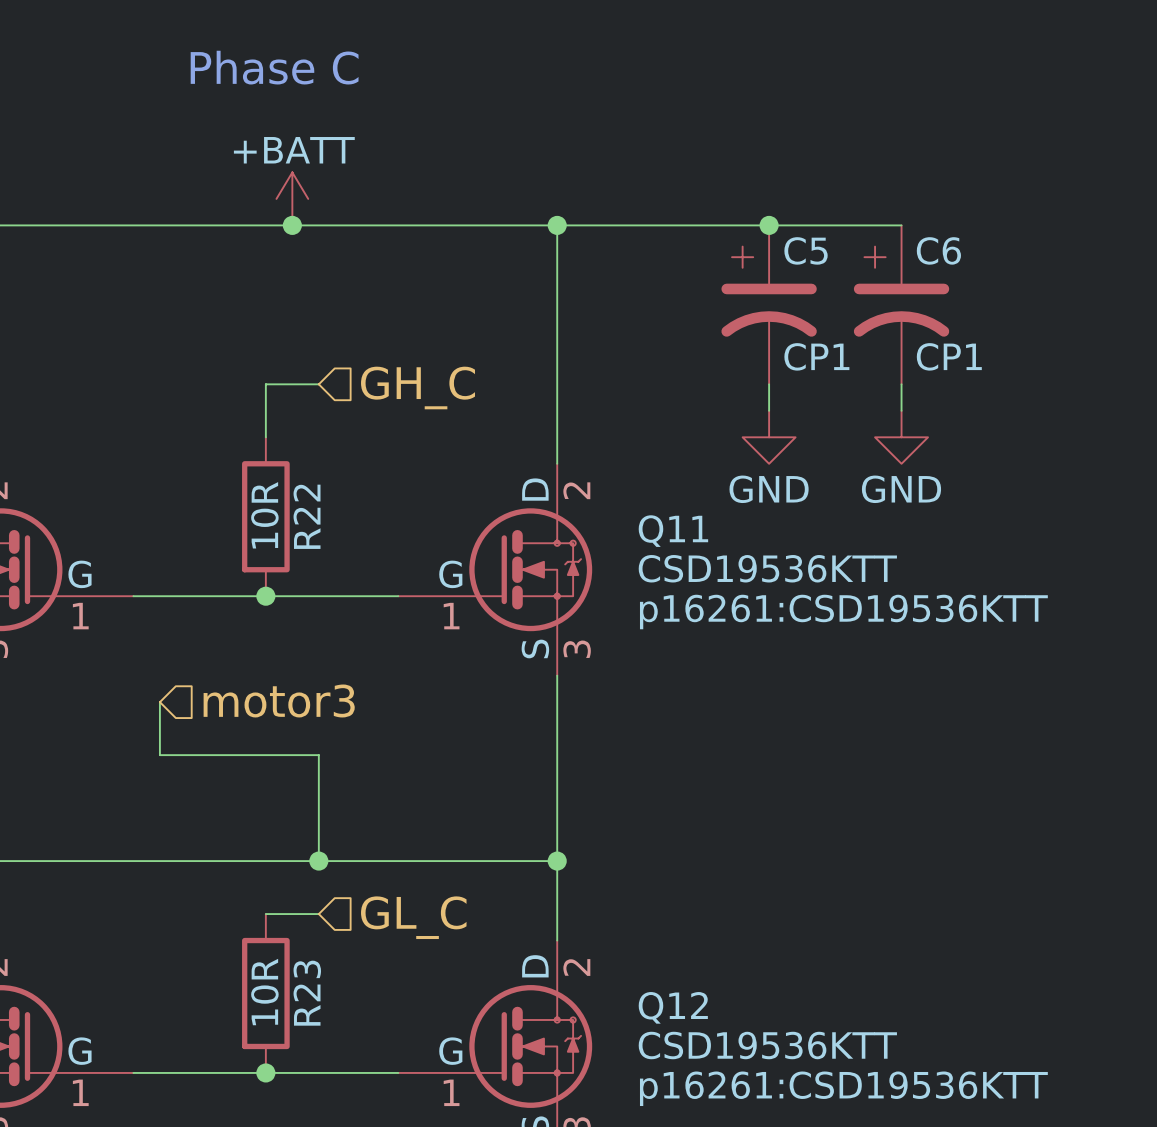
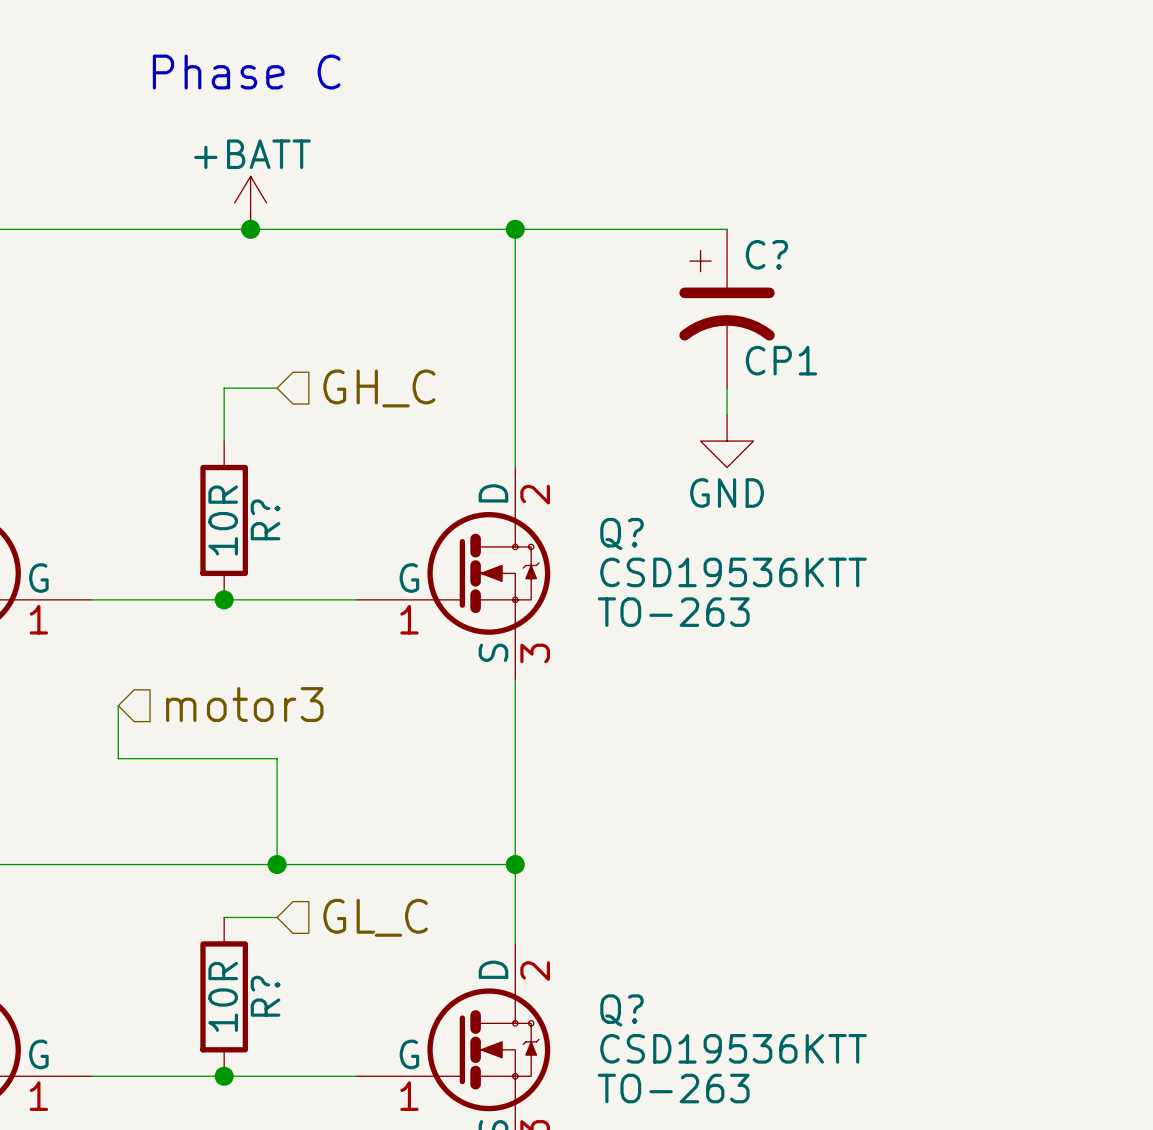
wire: (769, 225) (901, 225) -> none
junction: (769, 225) -> none
C5 name: C5 (806, 250) -> C? (766, 254)
C6: CP1 (901, 304) -> none
wire: (901, 384) (901, 410) -> none
power symbol: GND (901, 437) -> none
R22 name: R22 (307, 516) -> R? (265, 519)
Q11 name: Q11 (673, 531) -> Q? (621, 533)
Q11 text: p16261:CSD19536KTT (843, 612) -> TO-263 (673, 612)
R23 name: R23 (307, 993) -> R? (265, 996)
Q12 name: Q12 (673, 1007) -> Q? (621, 1010)
Q12 text: p16261:CSD19536KTT (843, 1088) -> TO-263 (673, 1088)

